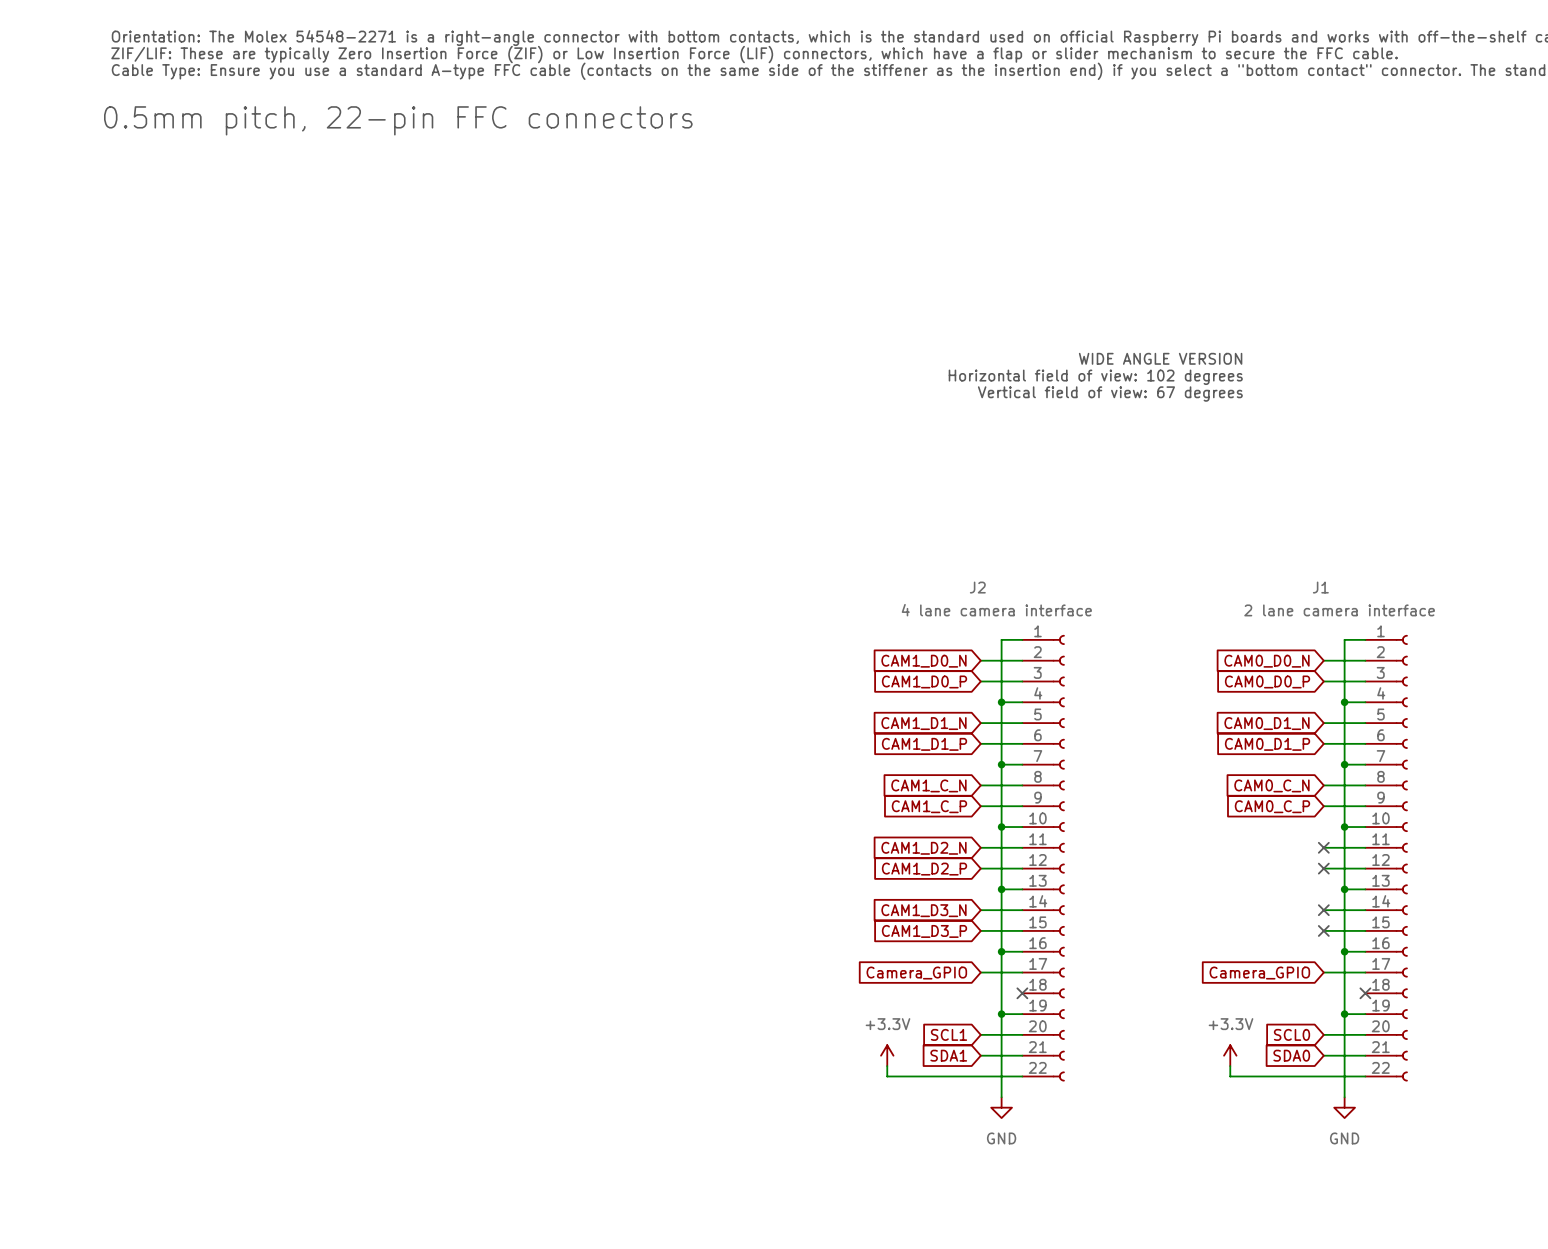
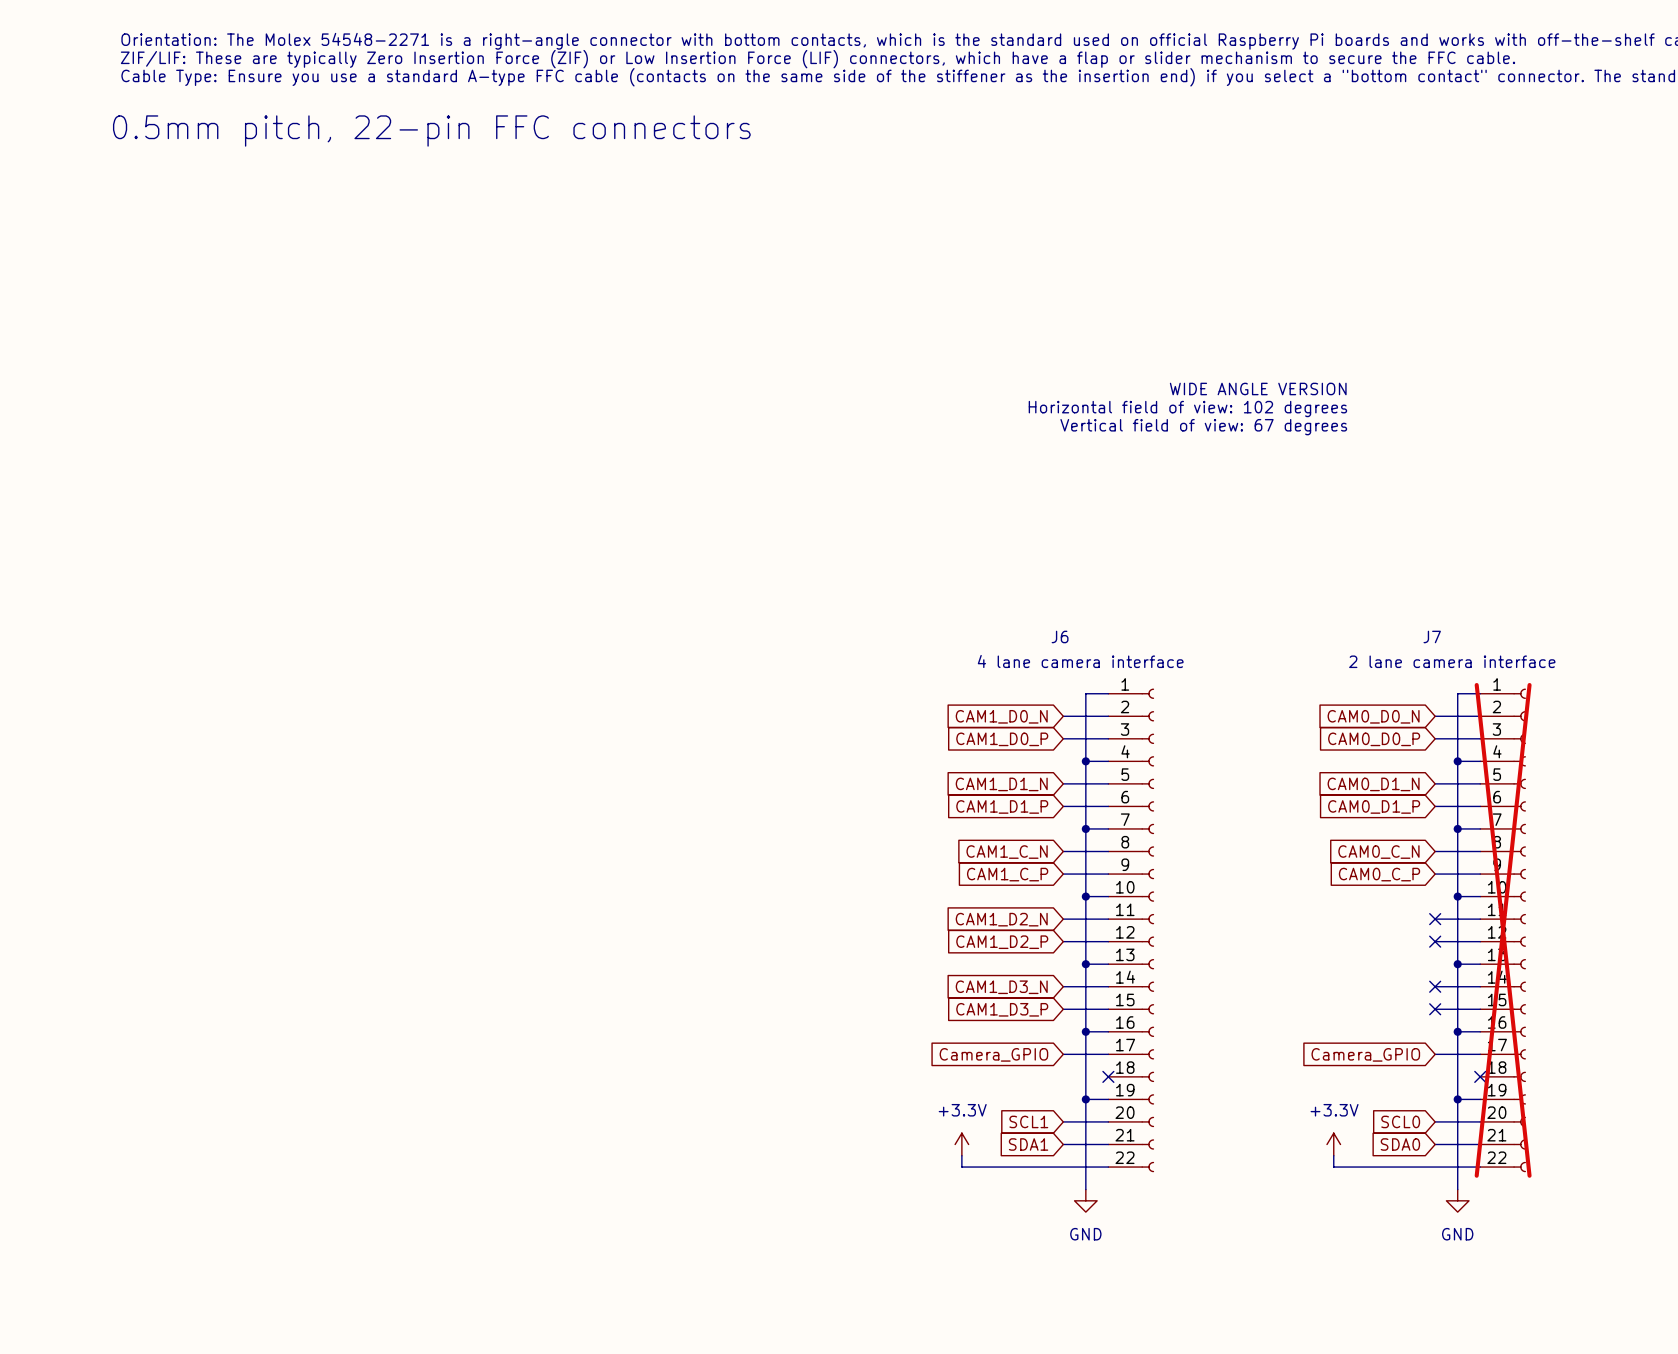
J2 name: J2 (977, 587) -> J6 (1060, 636)
J1 name: J1 (1320, 587) -> J7 (1432, 636)
J1 do-not-place cross: none -> (1503, 930)

